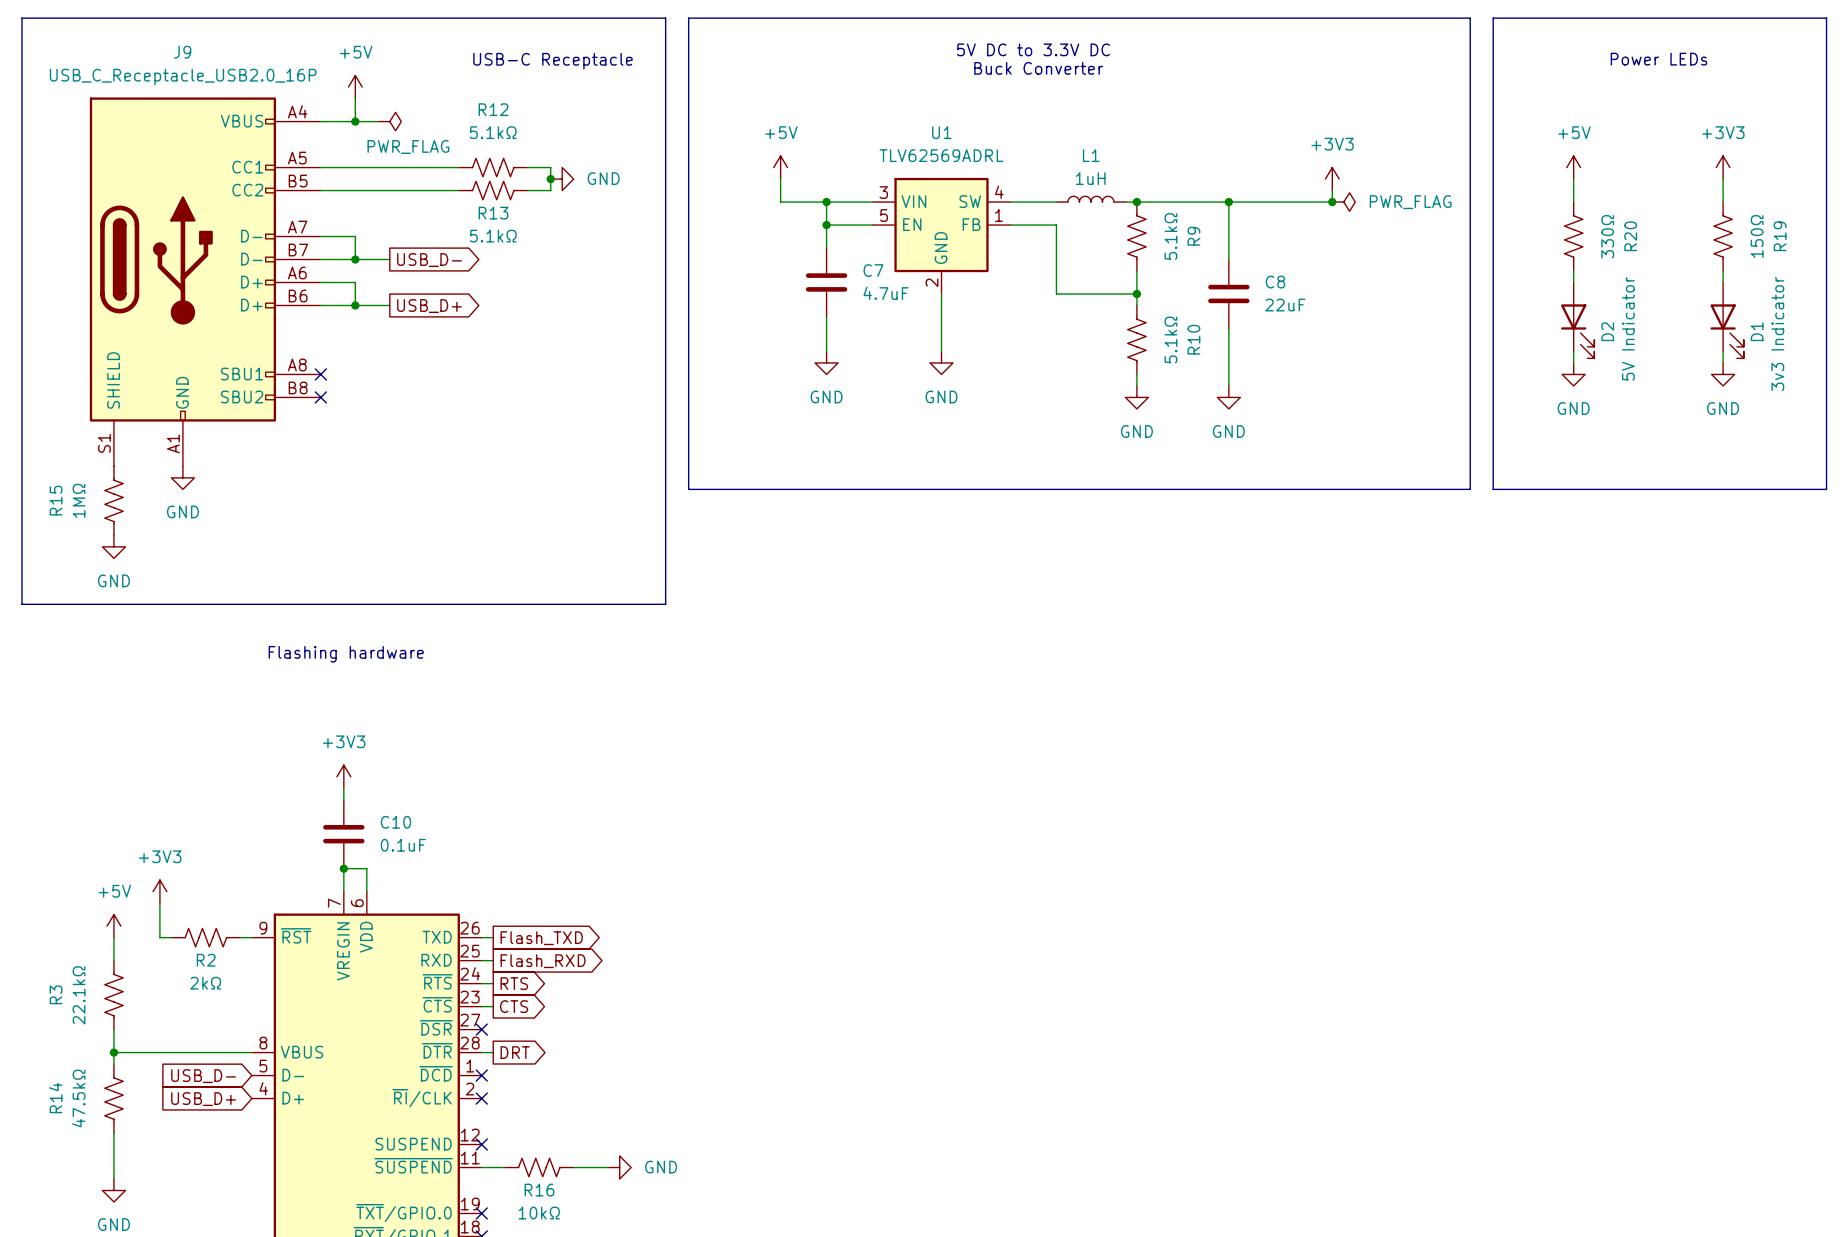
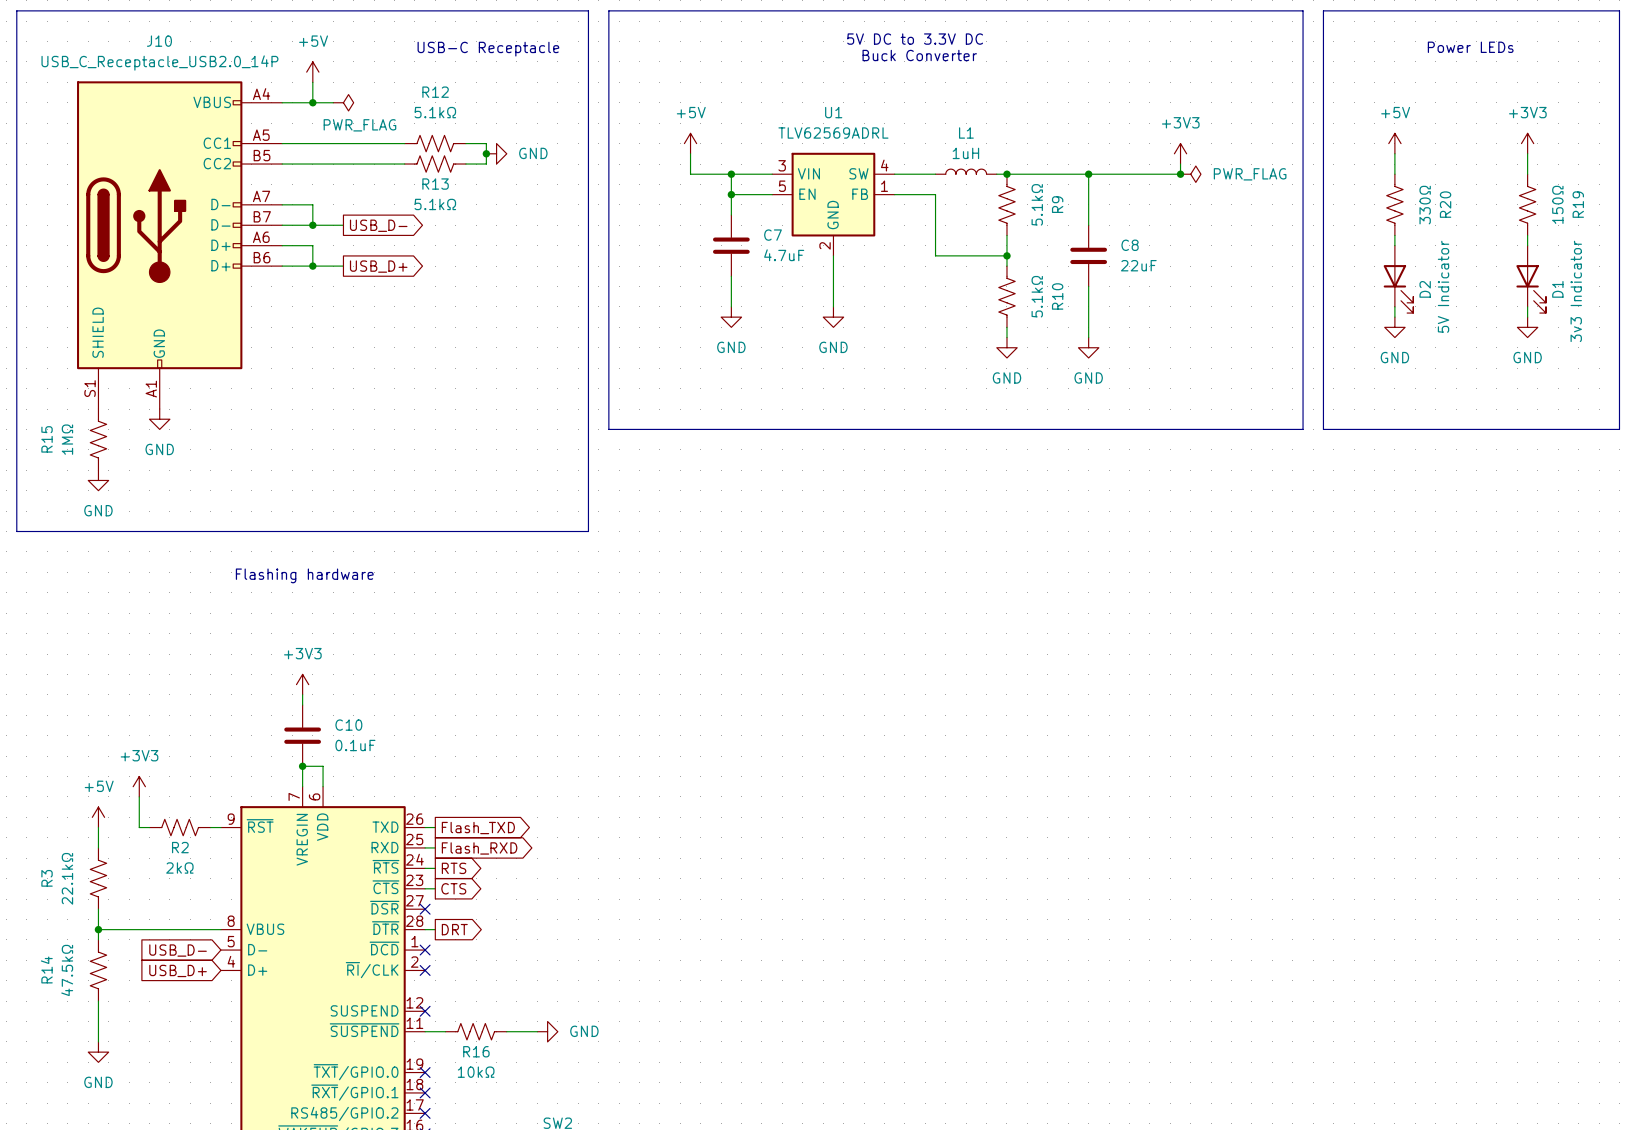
J9: USB_C_Receptacle_USB2.0_16P (205, 281) -> none
J10: none -> USB_C_Receptacle_USB2.0_14P (179, 245)
no-connect mark: (320, 374) -> none
no-connect mark: (320, 397) -> none

